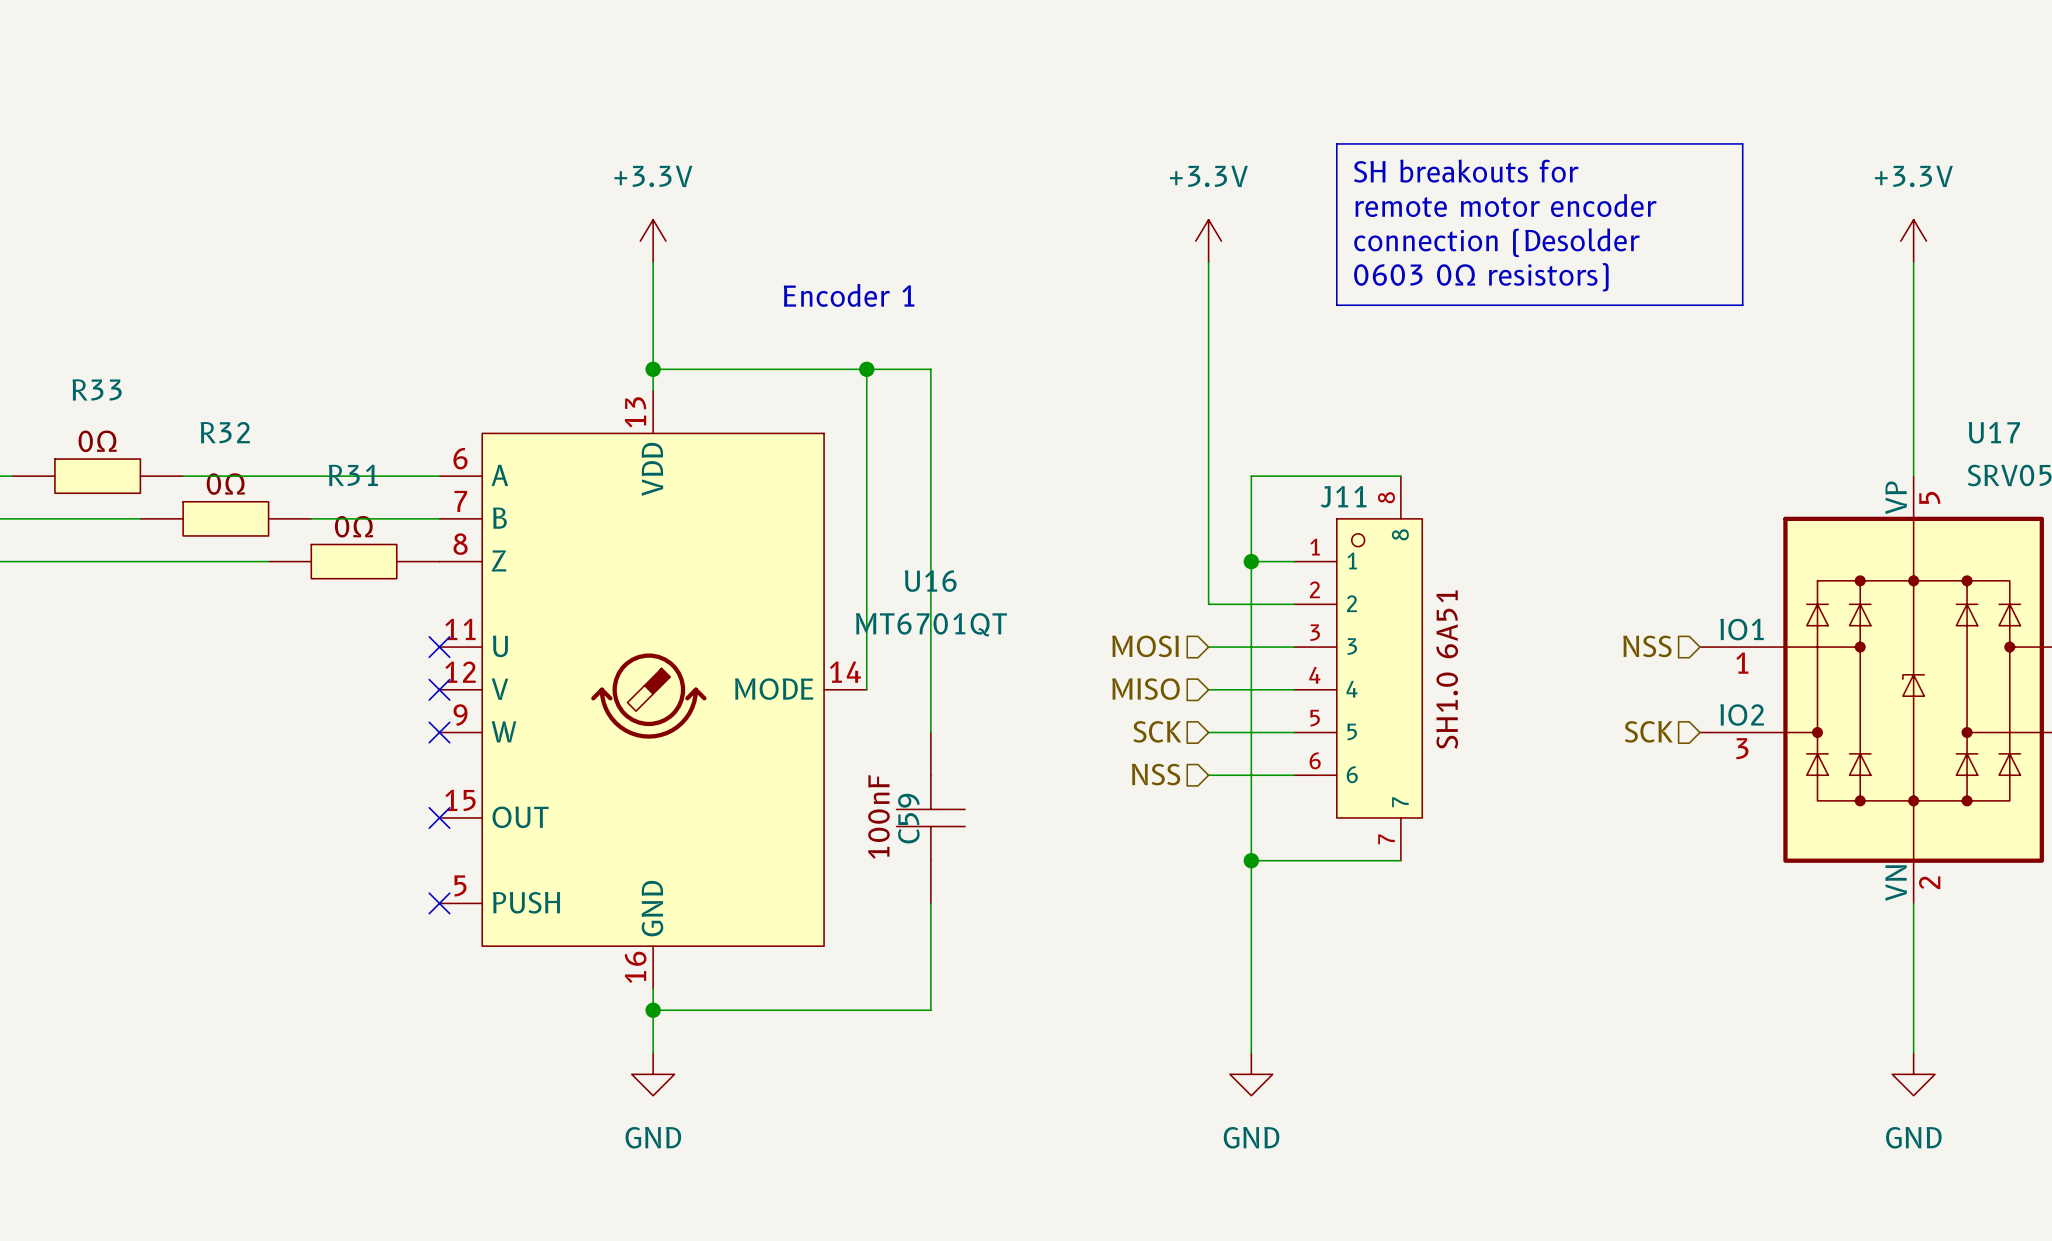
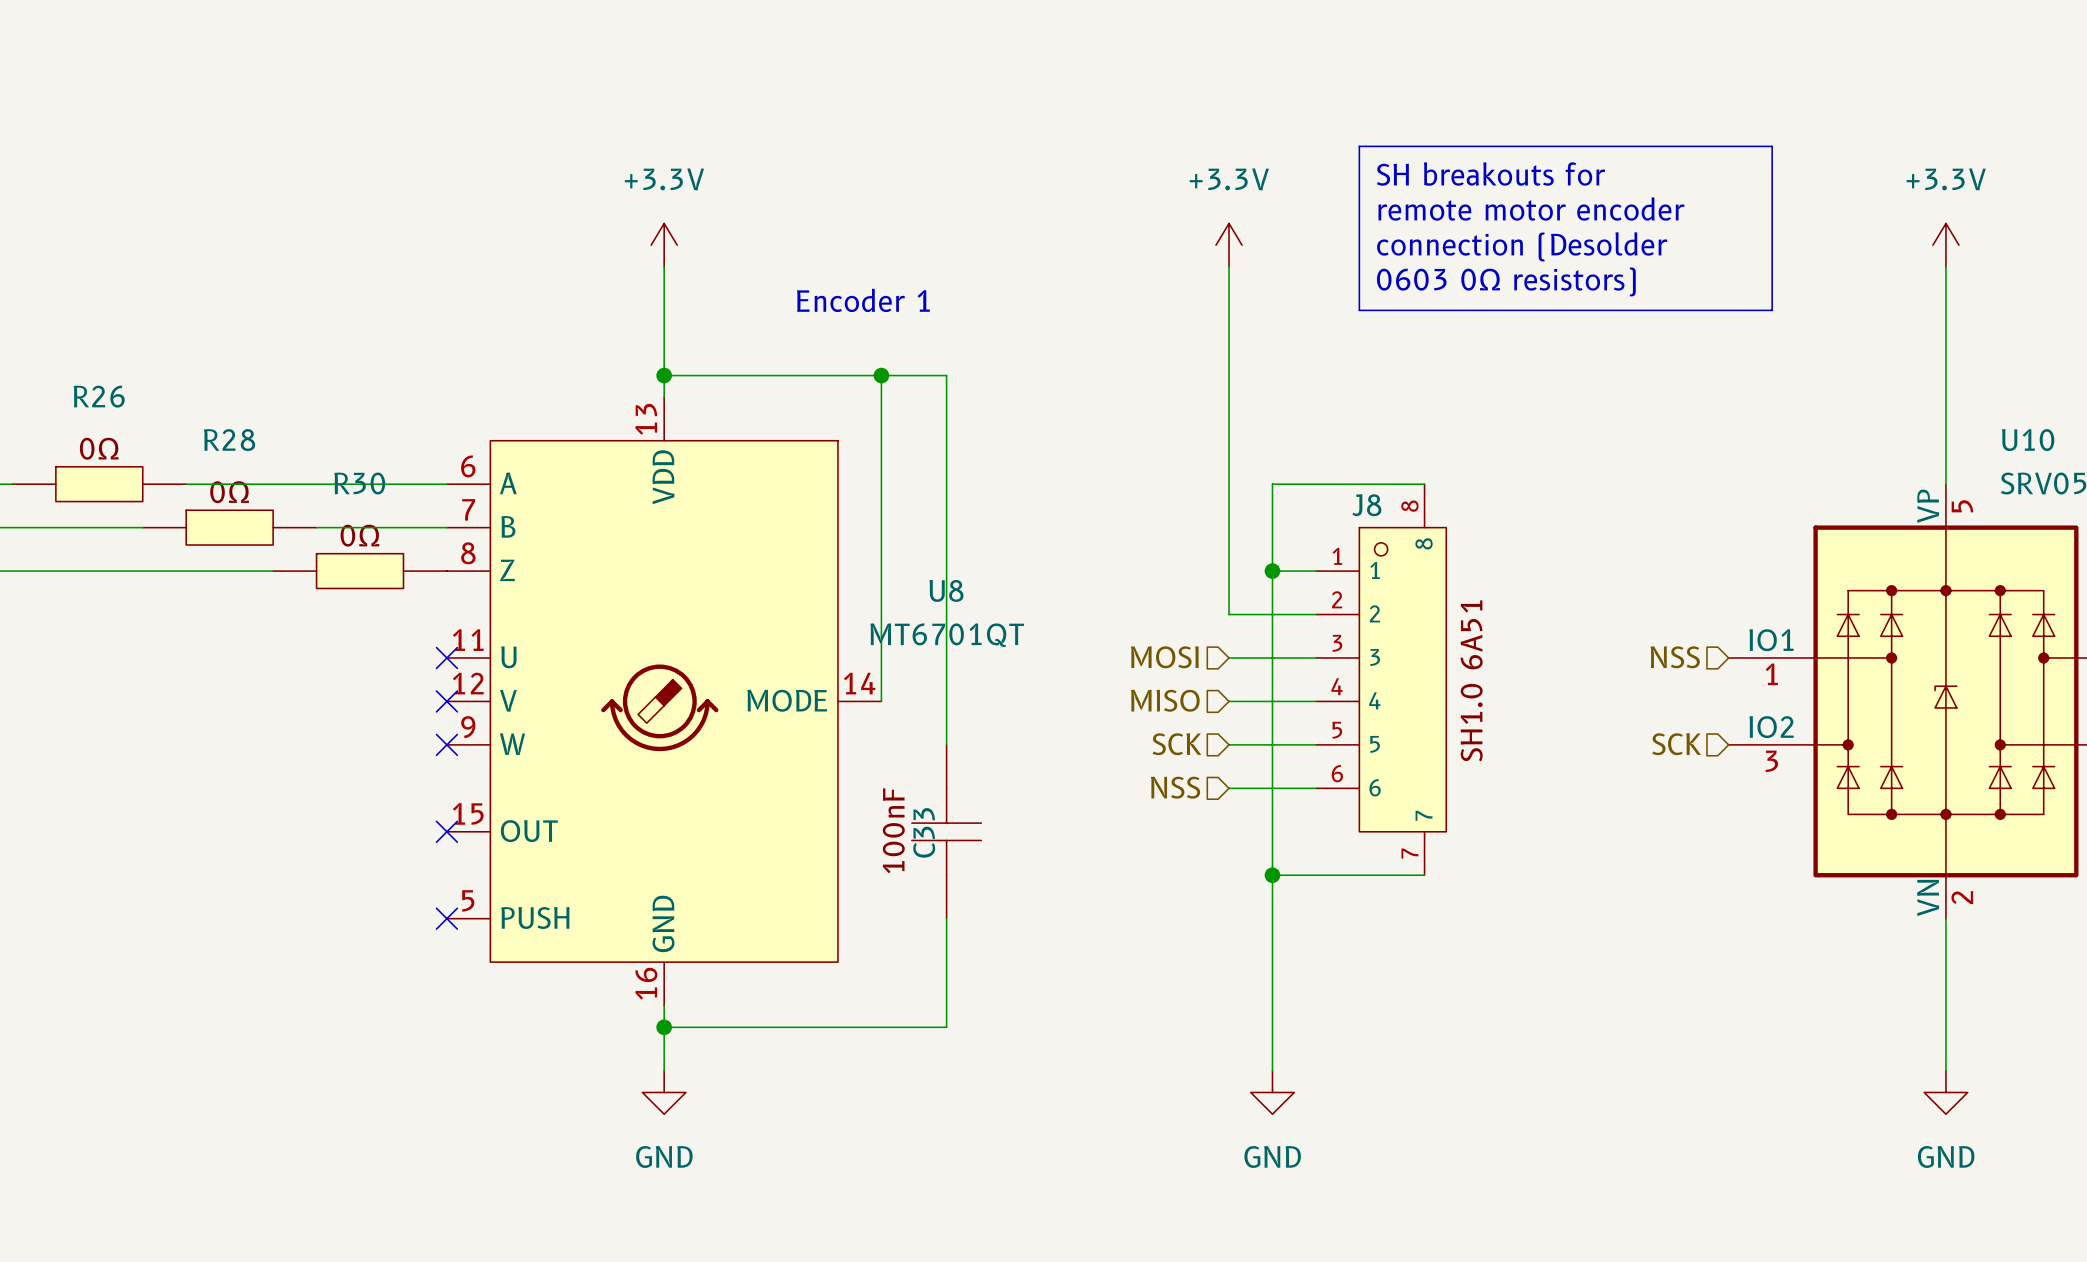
R33 name: R33 (97, 389) -> R26 (99, 396)
R32 name: R32 (225, 432) -> R28 (229, 440)
U17 name: U17 (1994, 432) -> U10 (2028, 440)
R31 name: R31 (353, 475) -> R30 (359, 483)
J11 name: J11 (1343, 496) -> J8 (1366, 505)
U16 name: U16 (930, 581) -> U8 (946, 590)
C59 name: C59 (908, 818) -> C33 (924, 832)

